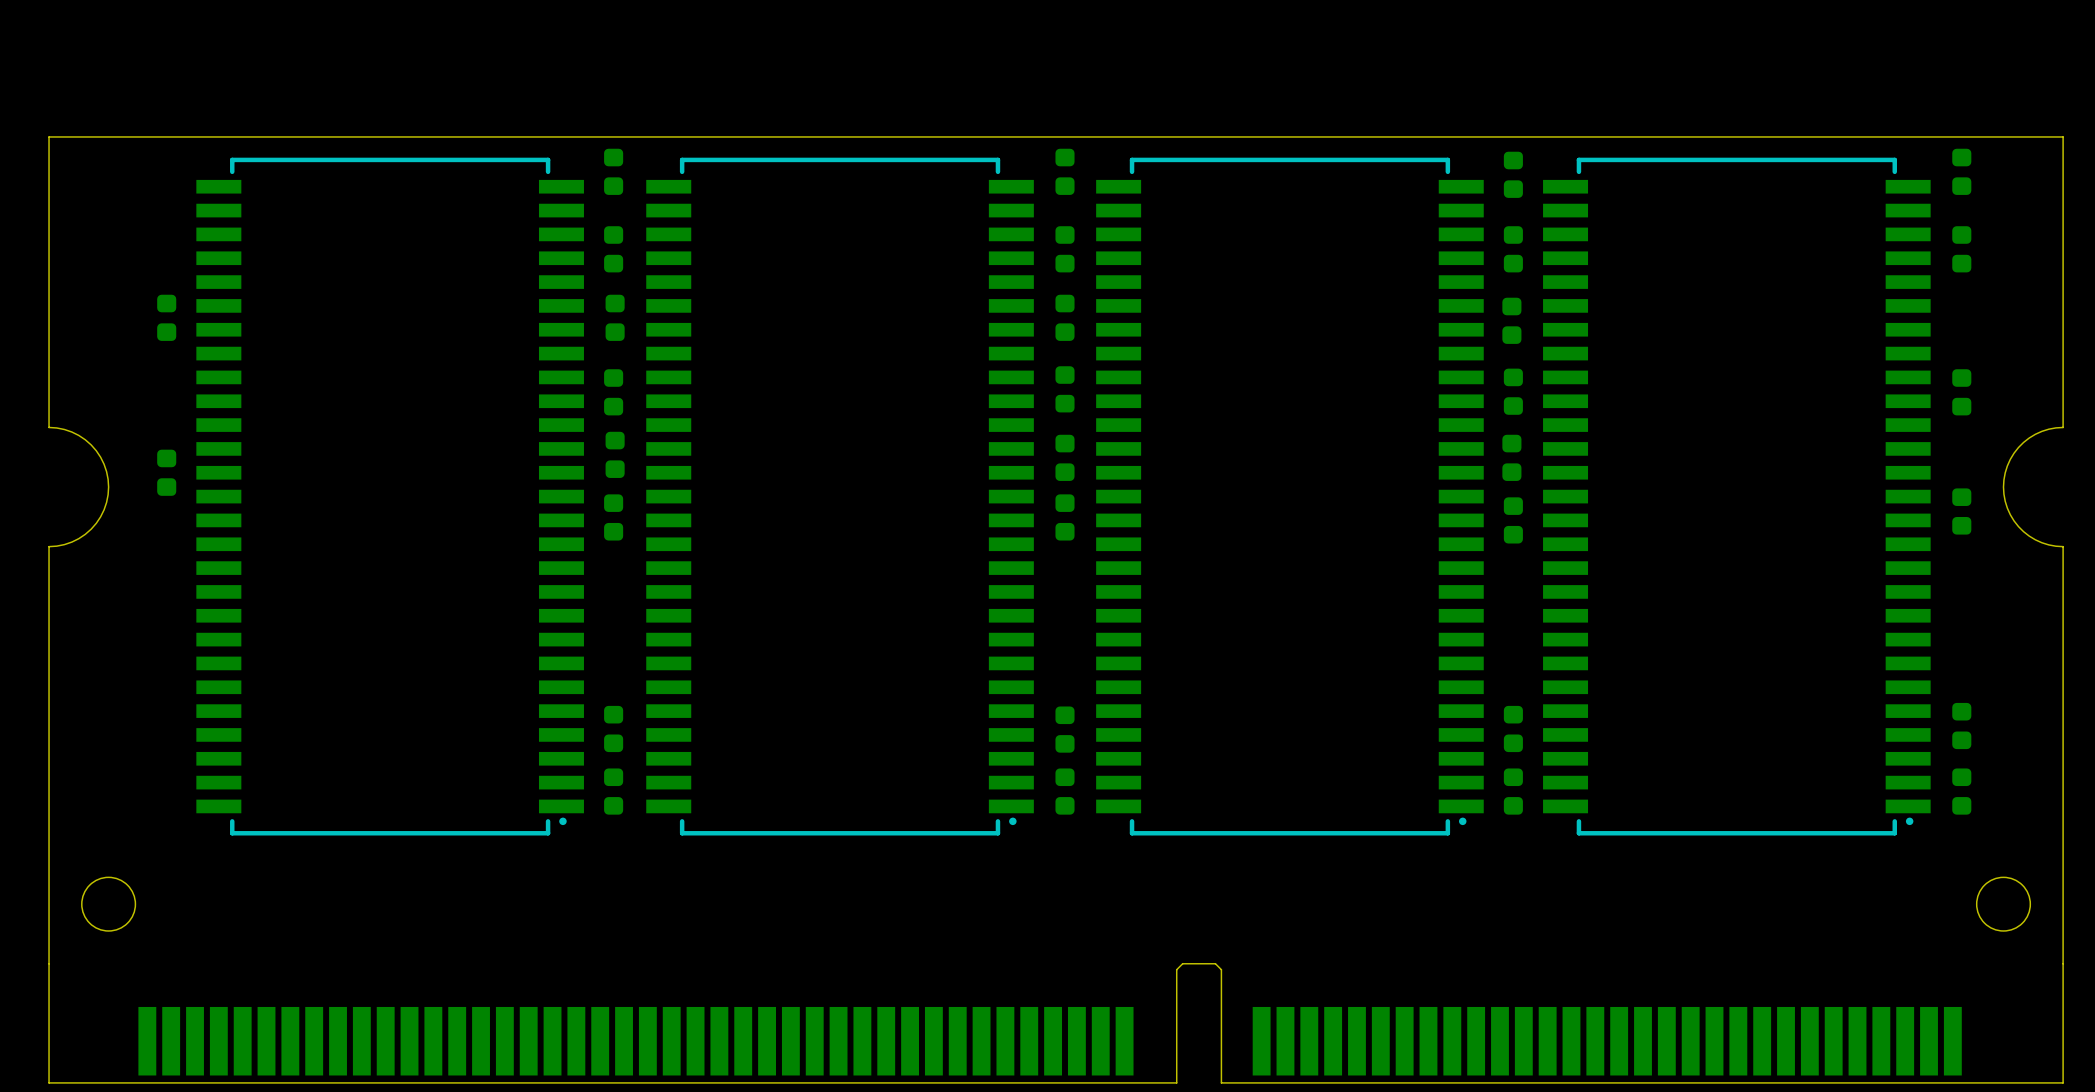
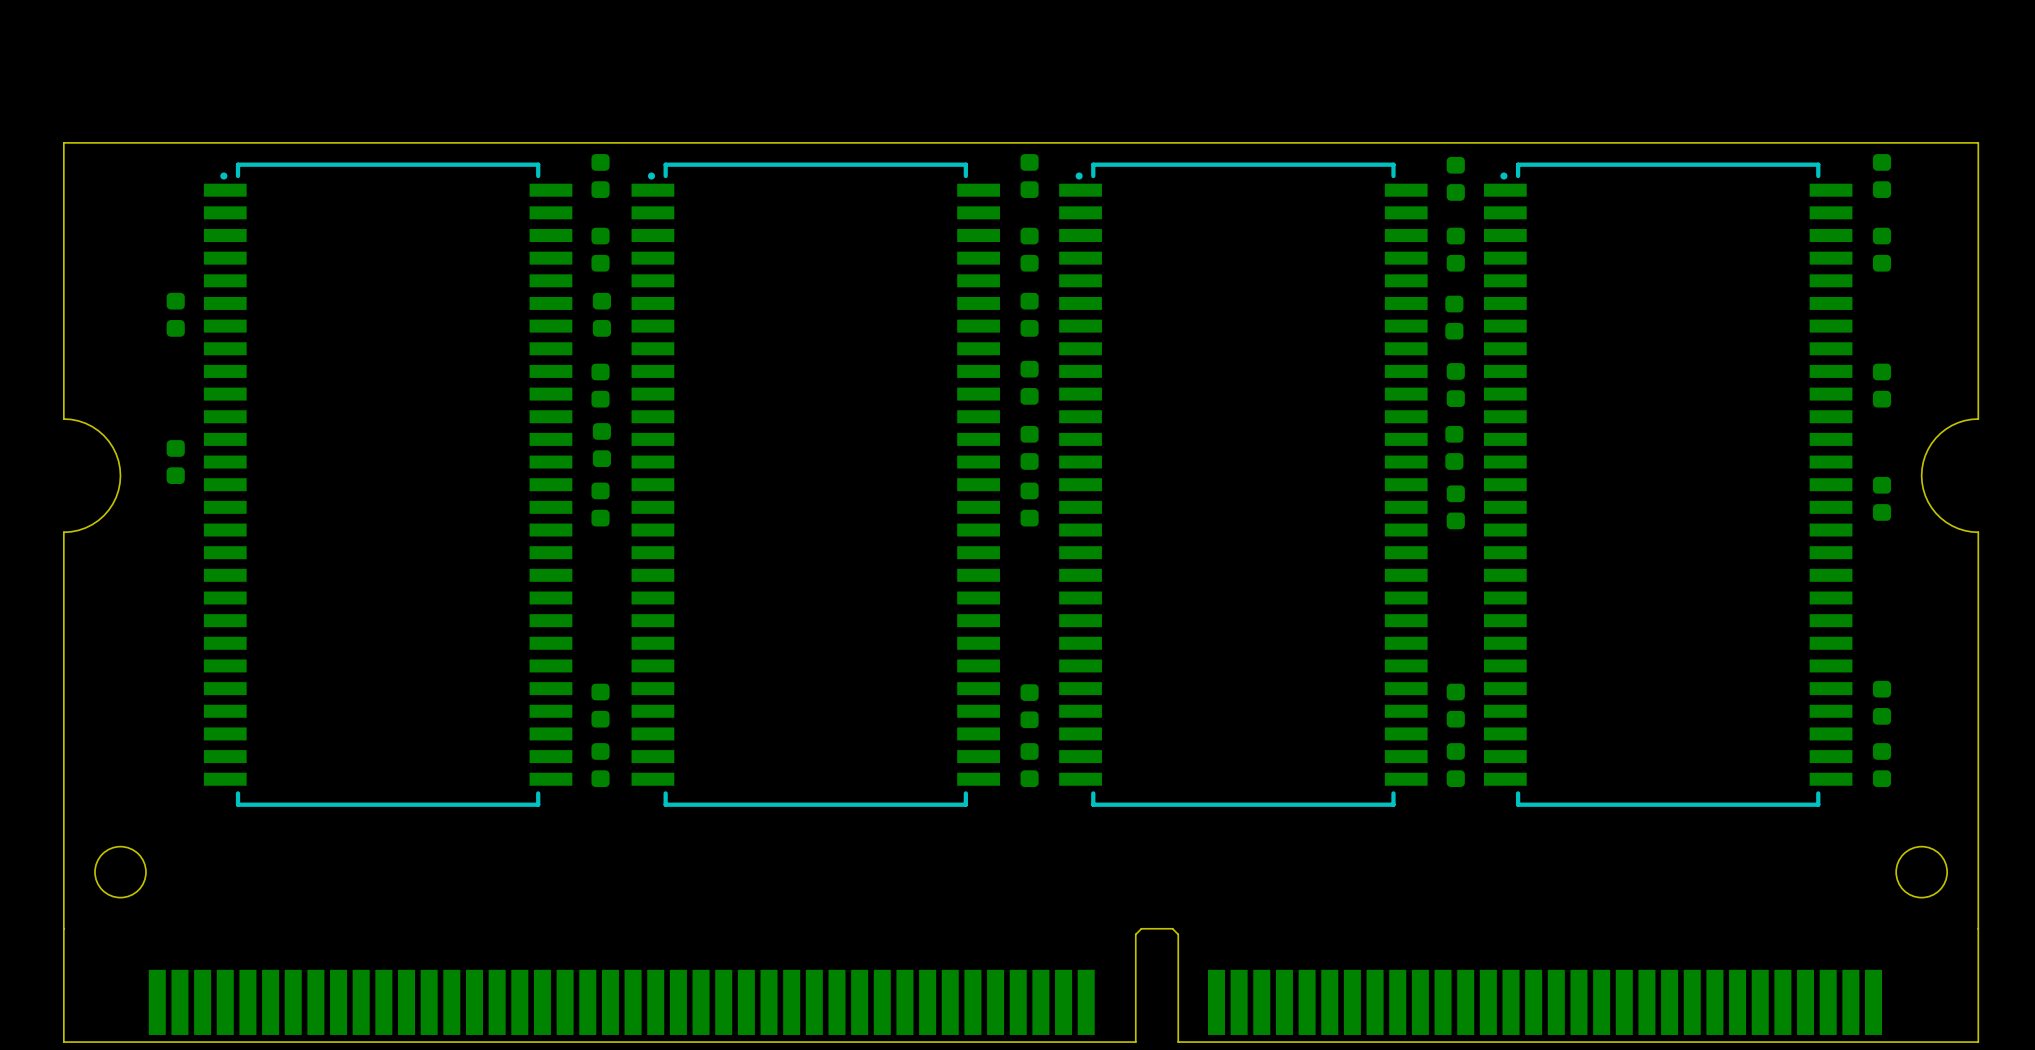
part rotation: 0° (390, 496) -> 180° (388, 484)
part rotation: 0° (840, 496) -> 180° (815, 484)
part rotation: 0° (1289, 496) -> 180° (1243, 484)
part rotation: 0° (1736, 496) -> 180° (1668, 484)

